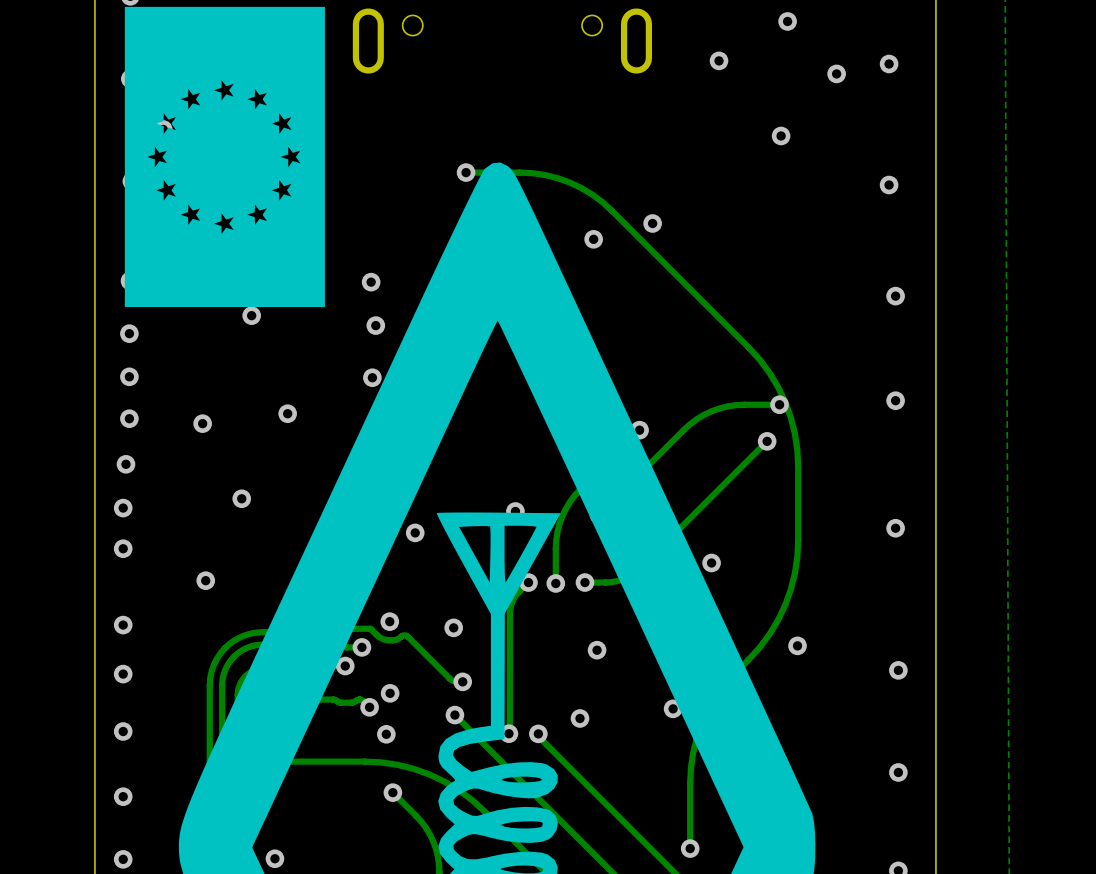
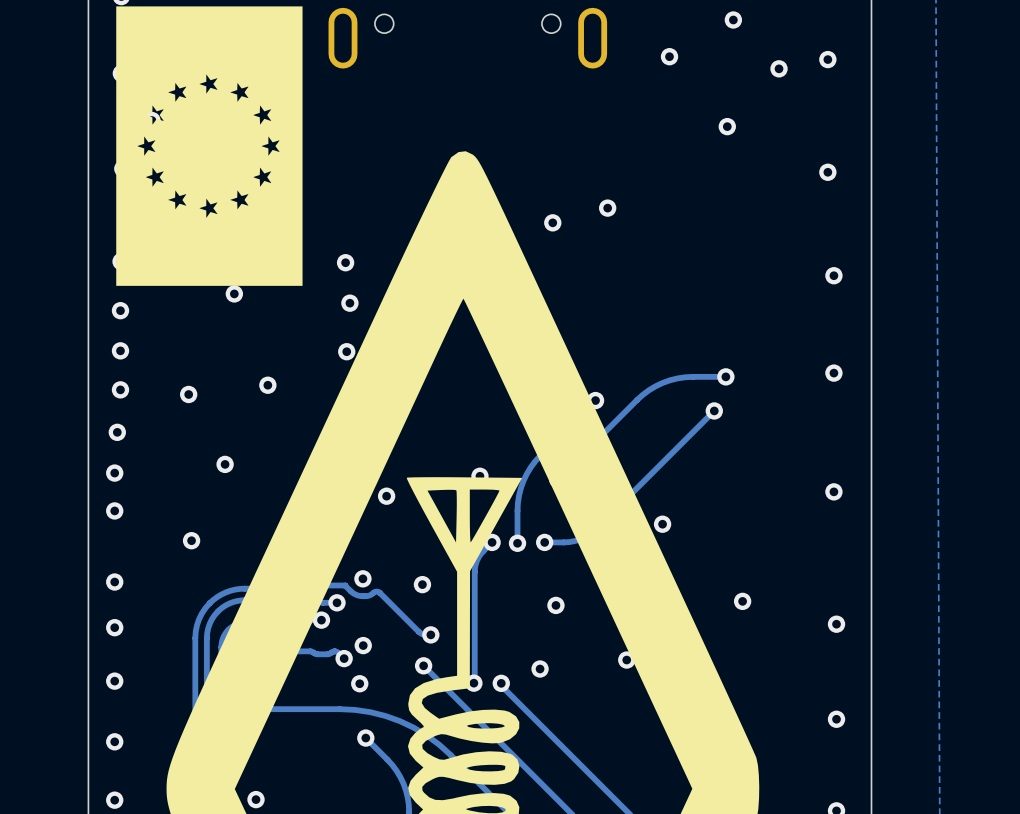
track: (466, 172) (519, 172) (545, 175) (581, 187) (602, 202) (759, 359) (778, 387) (790, 417) (794, 434) (798, 466) (798, 540) (794, 573) (785, 604) (769, 633) (725, 683) (716, 695) (702, 723) (696, 737) (690, 767) (690, 848) -> none
via: (466, 172) -> none
via: (690, 848) -> none

